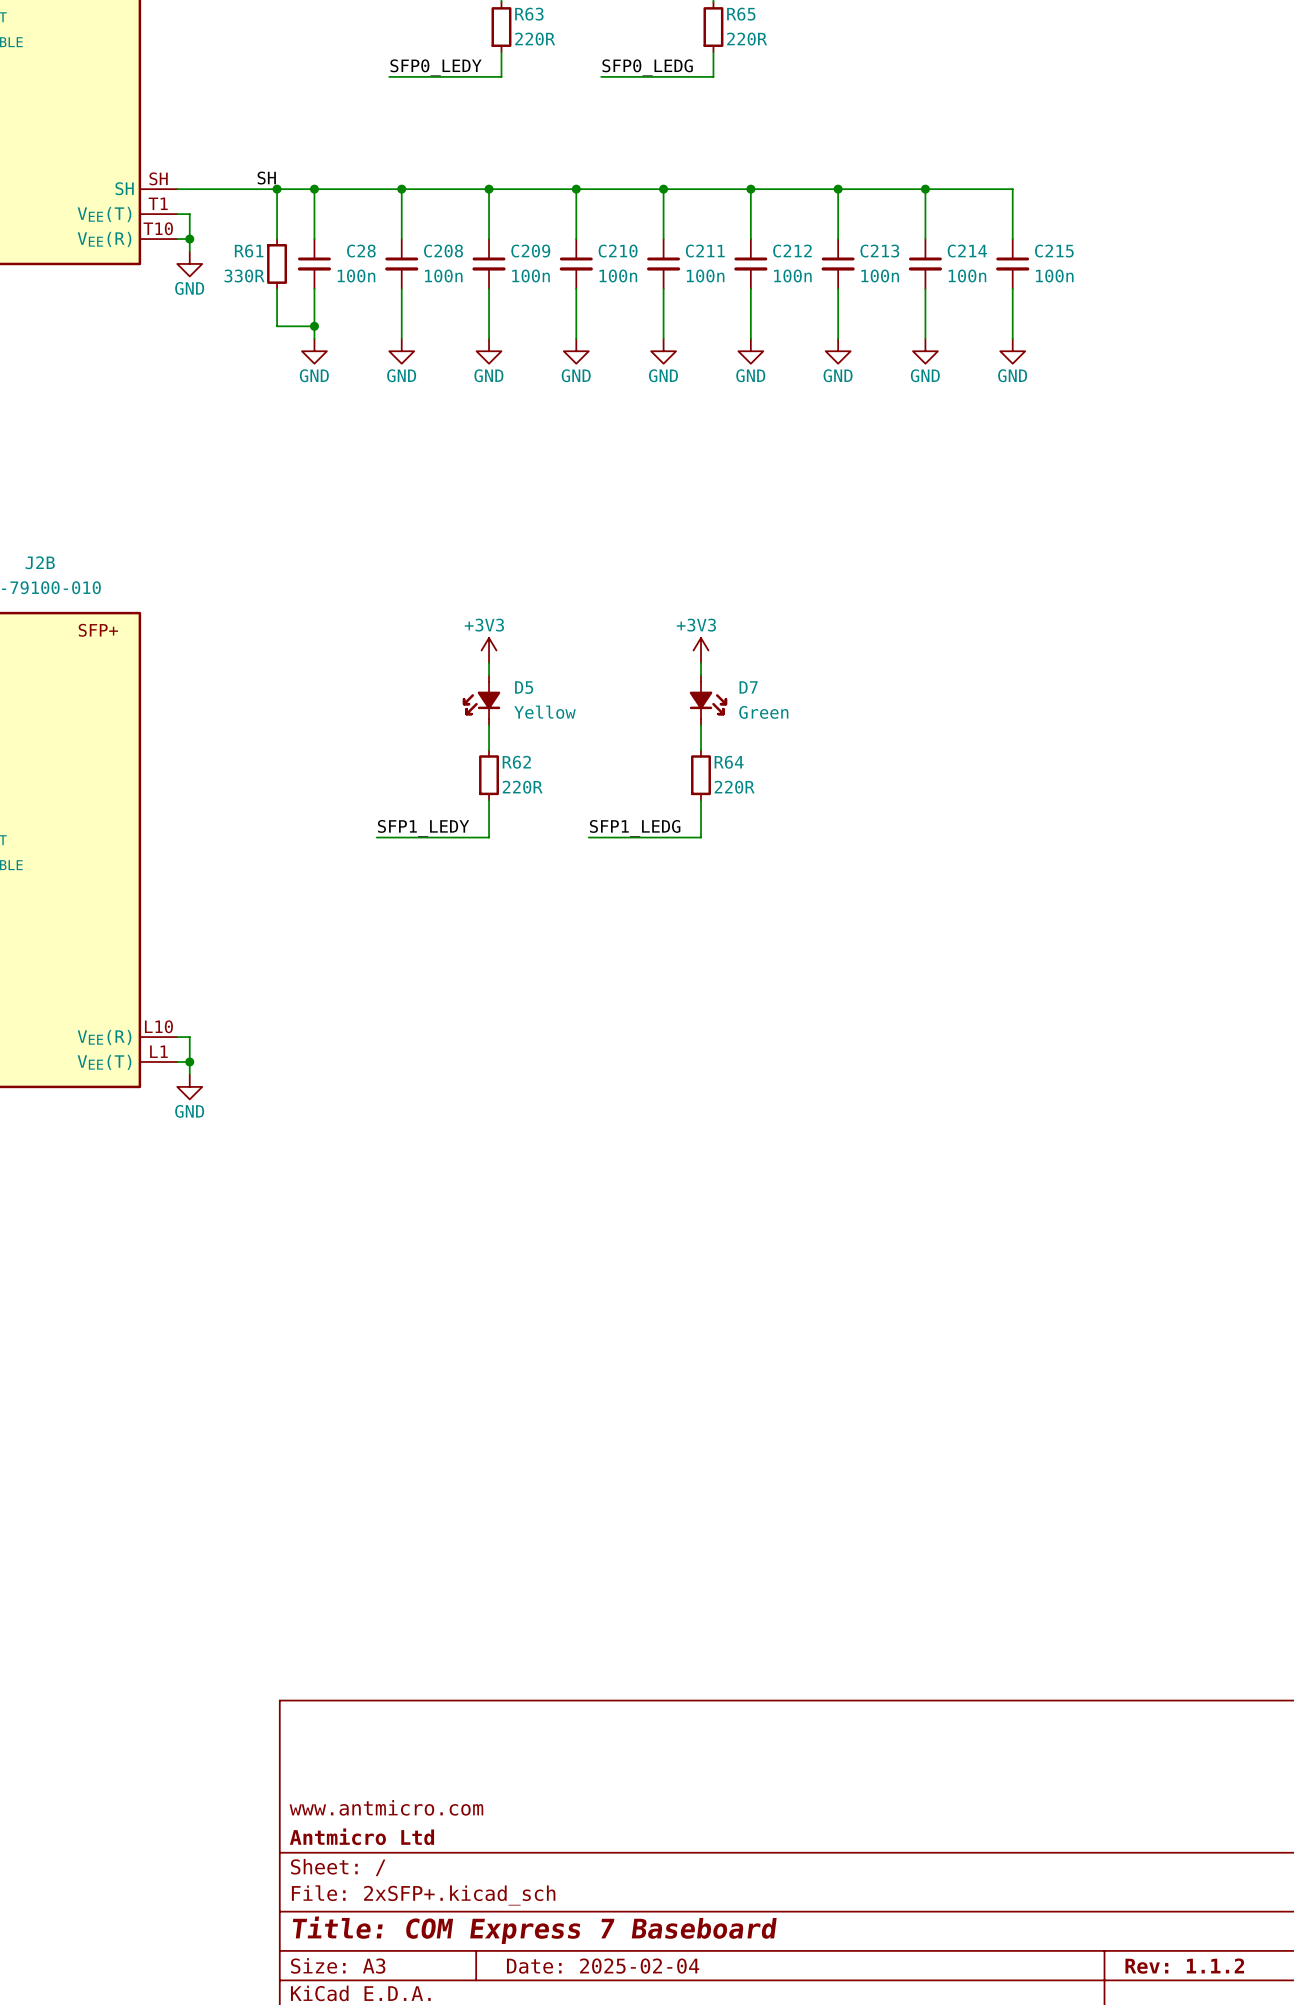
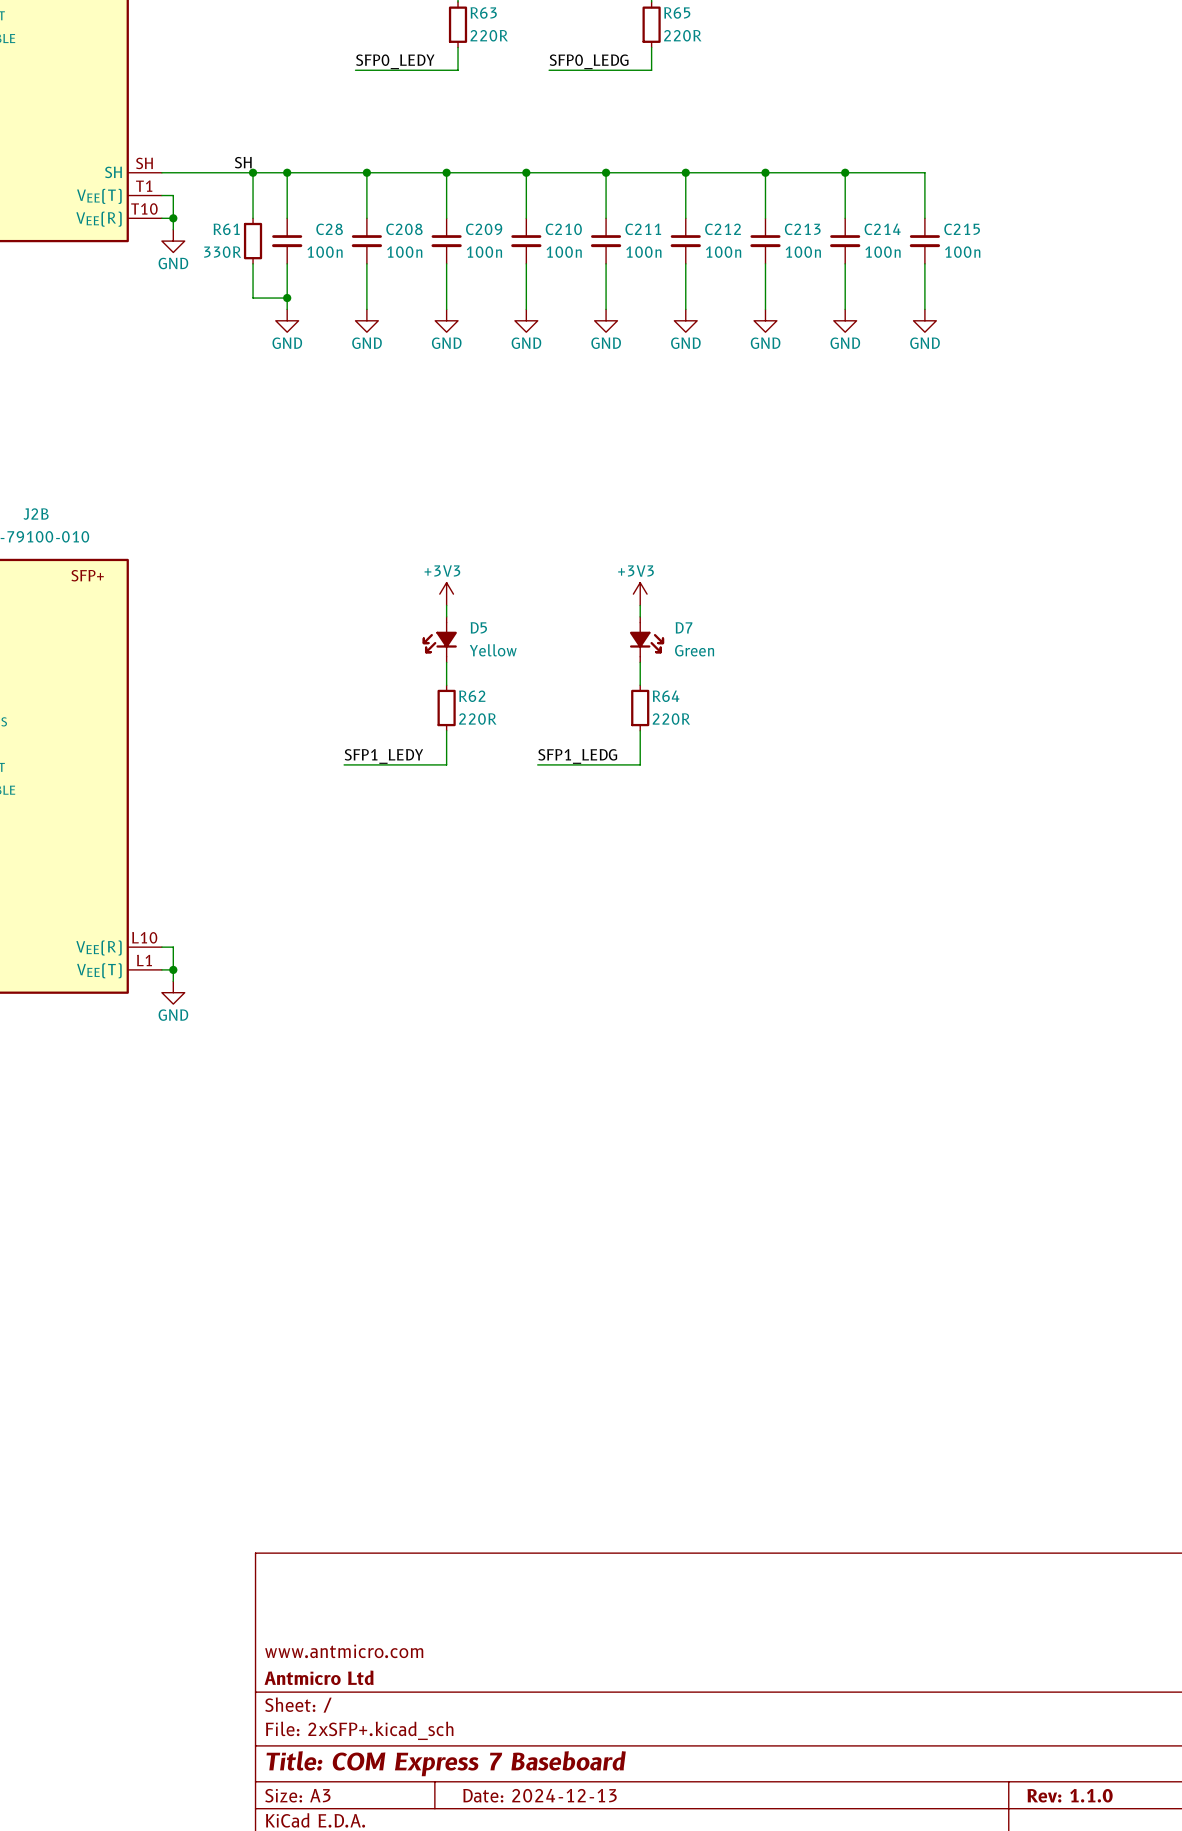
title block: Date: 2025-02-04 (603, 1966) -> Date: 2024-12-13 (539, 1795)
title block: Rev: 1.1.2 (1184, 1966) -> Rev: 1.1.0 (1070, 1795)

